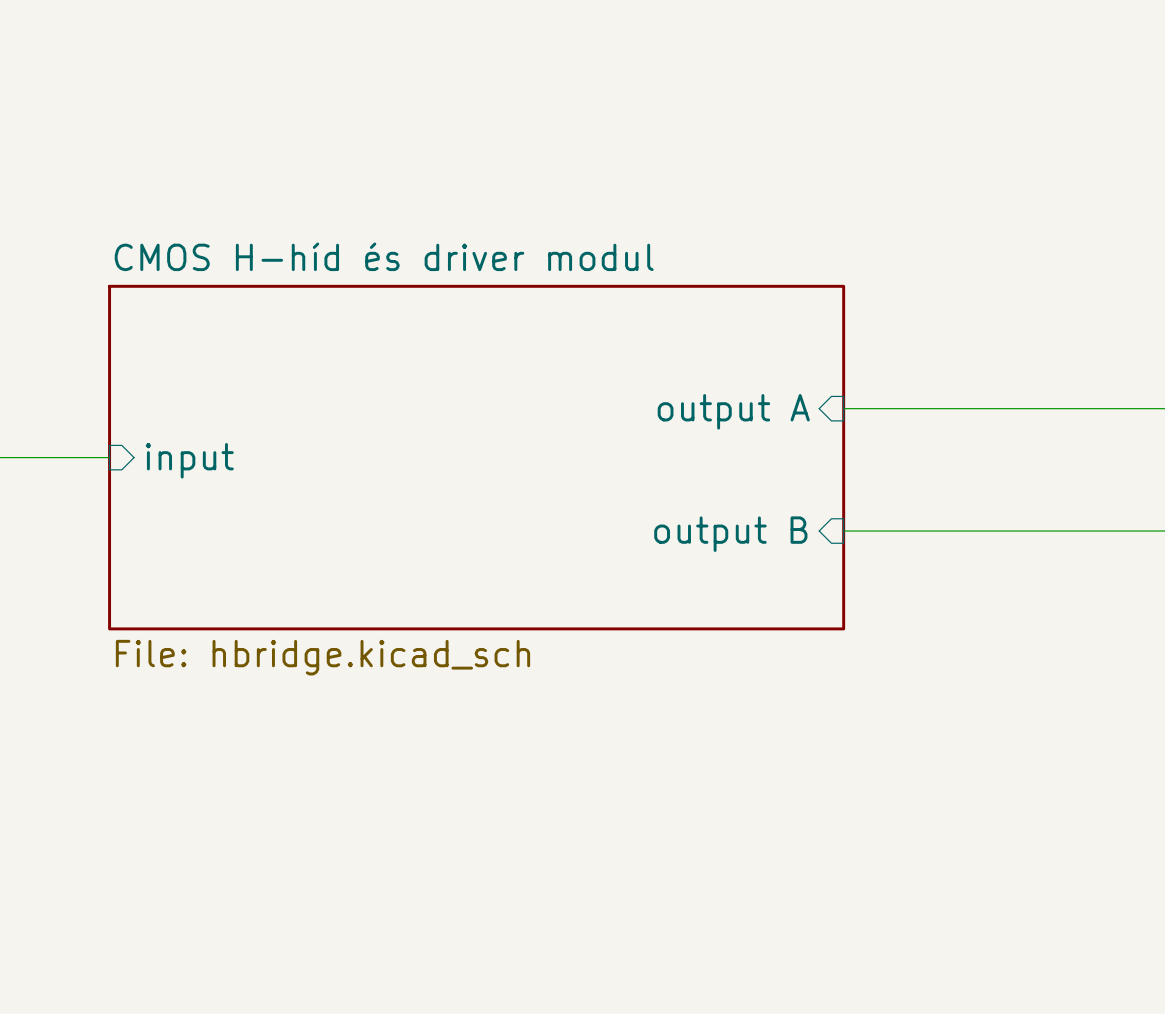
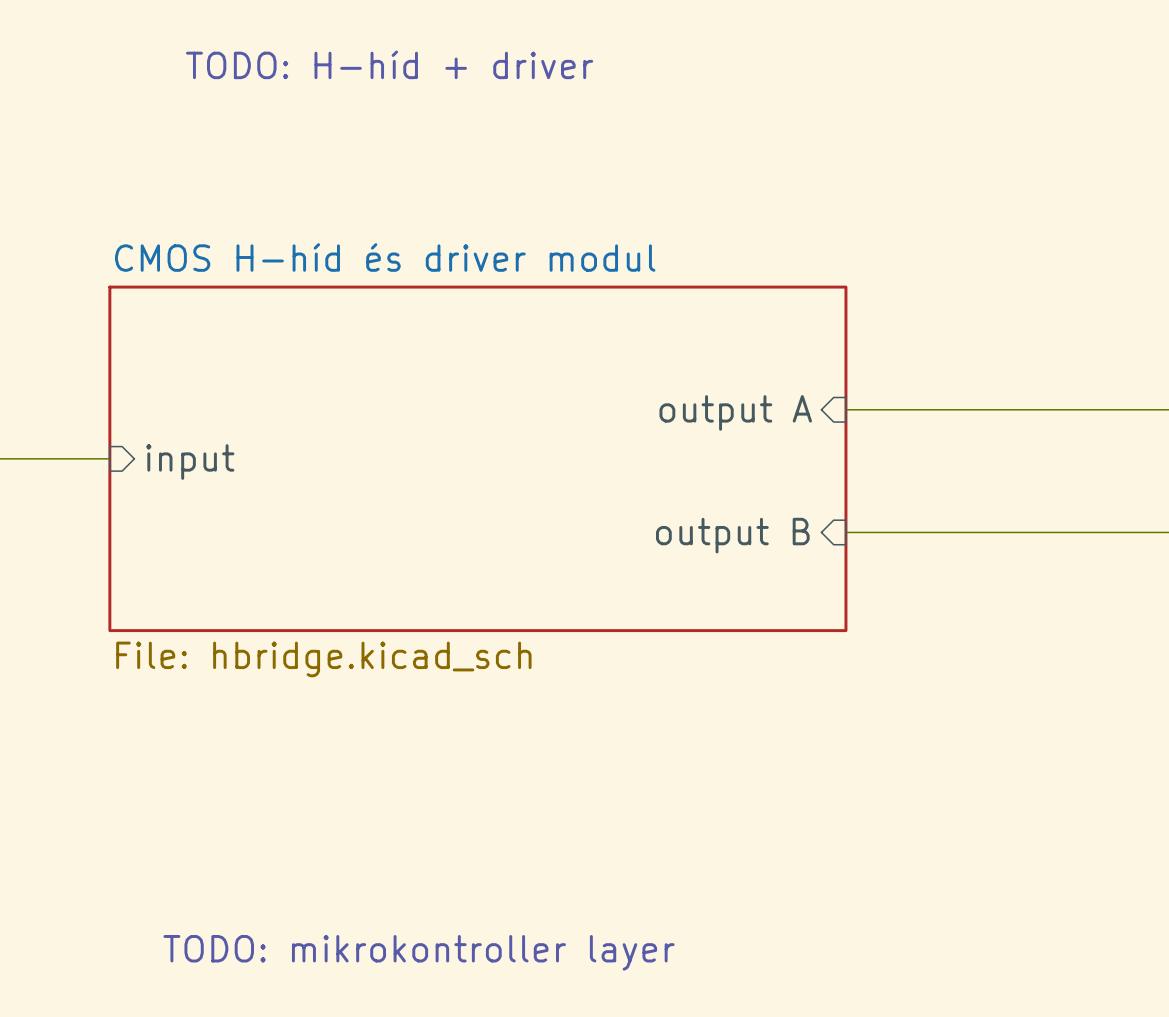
text: none -> TODO: H-híd + driver (389, 64)
text: none -> TODO: mikrokontroller layer (419, 952)

